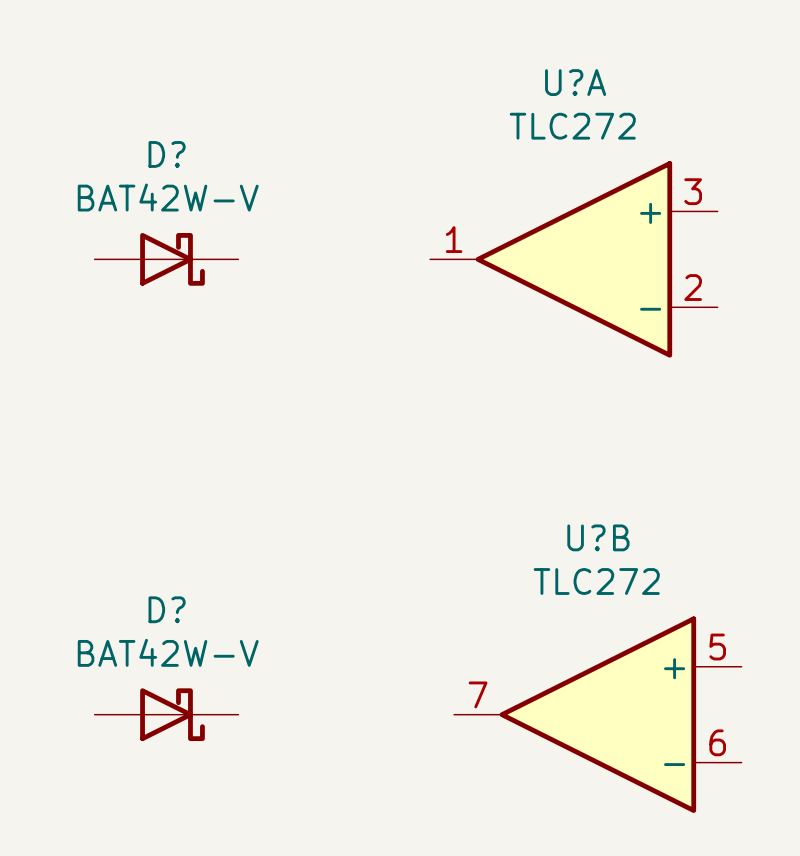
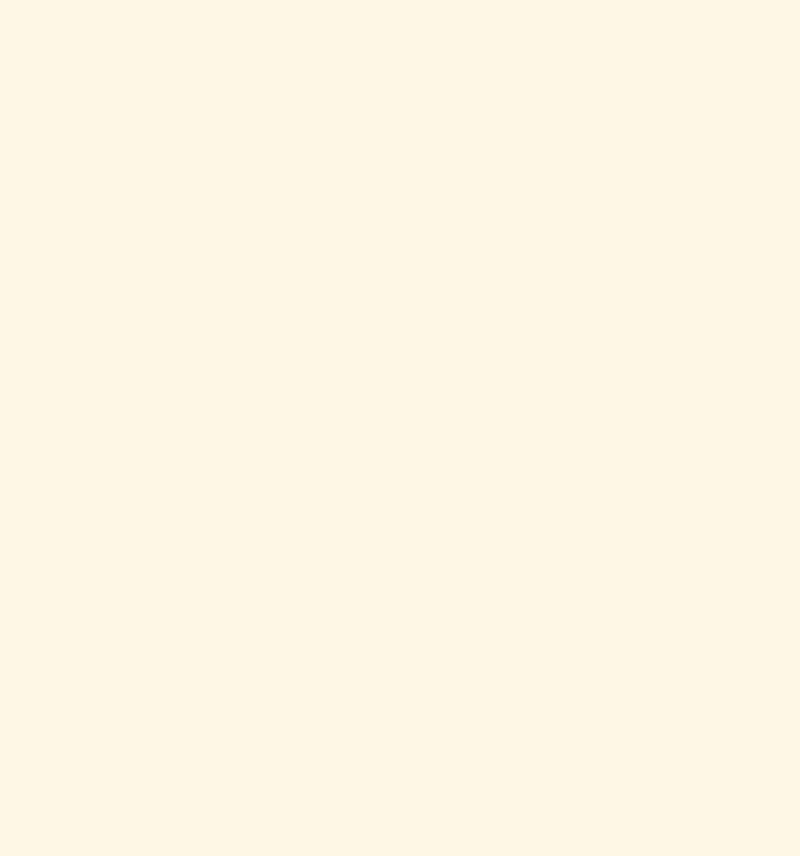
D?: BAT42W-V (166, 259) -> none
U?A: TLC272 (573, 259) -> none
D?: BAT42W-V (166, 714) -> none
U?B: TLC272 (597, 714) -> none

